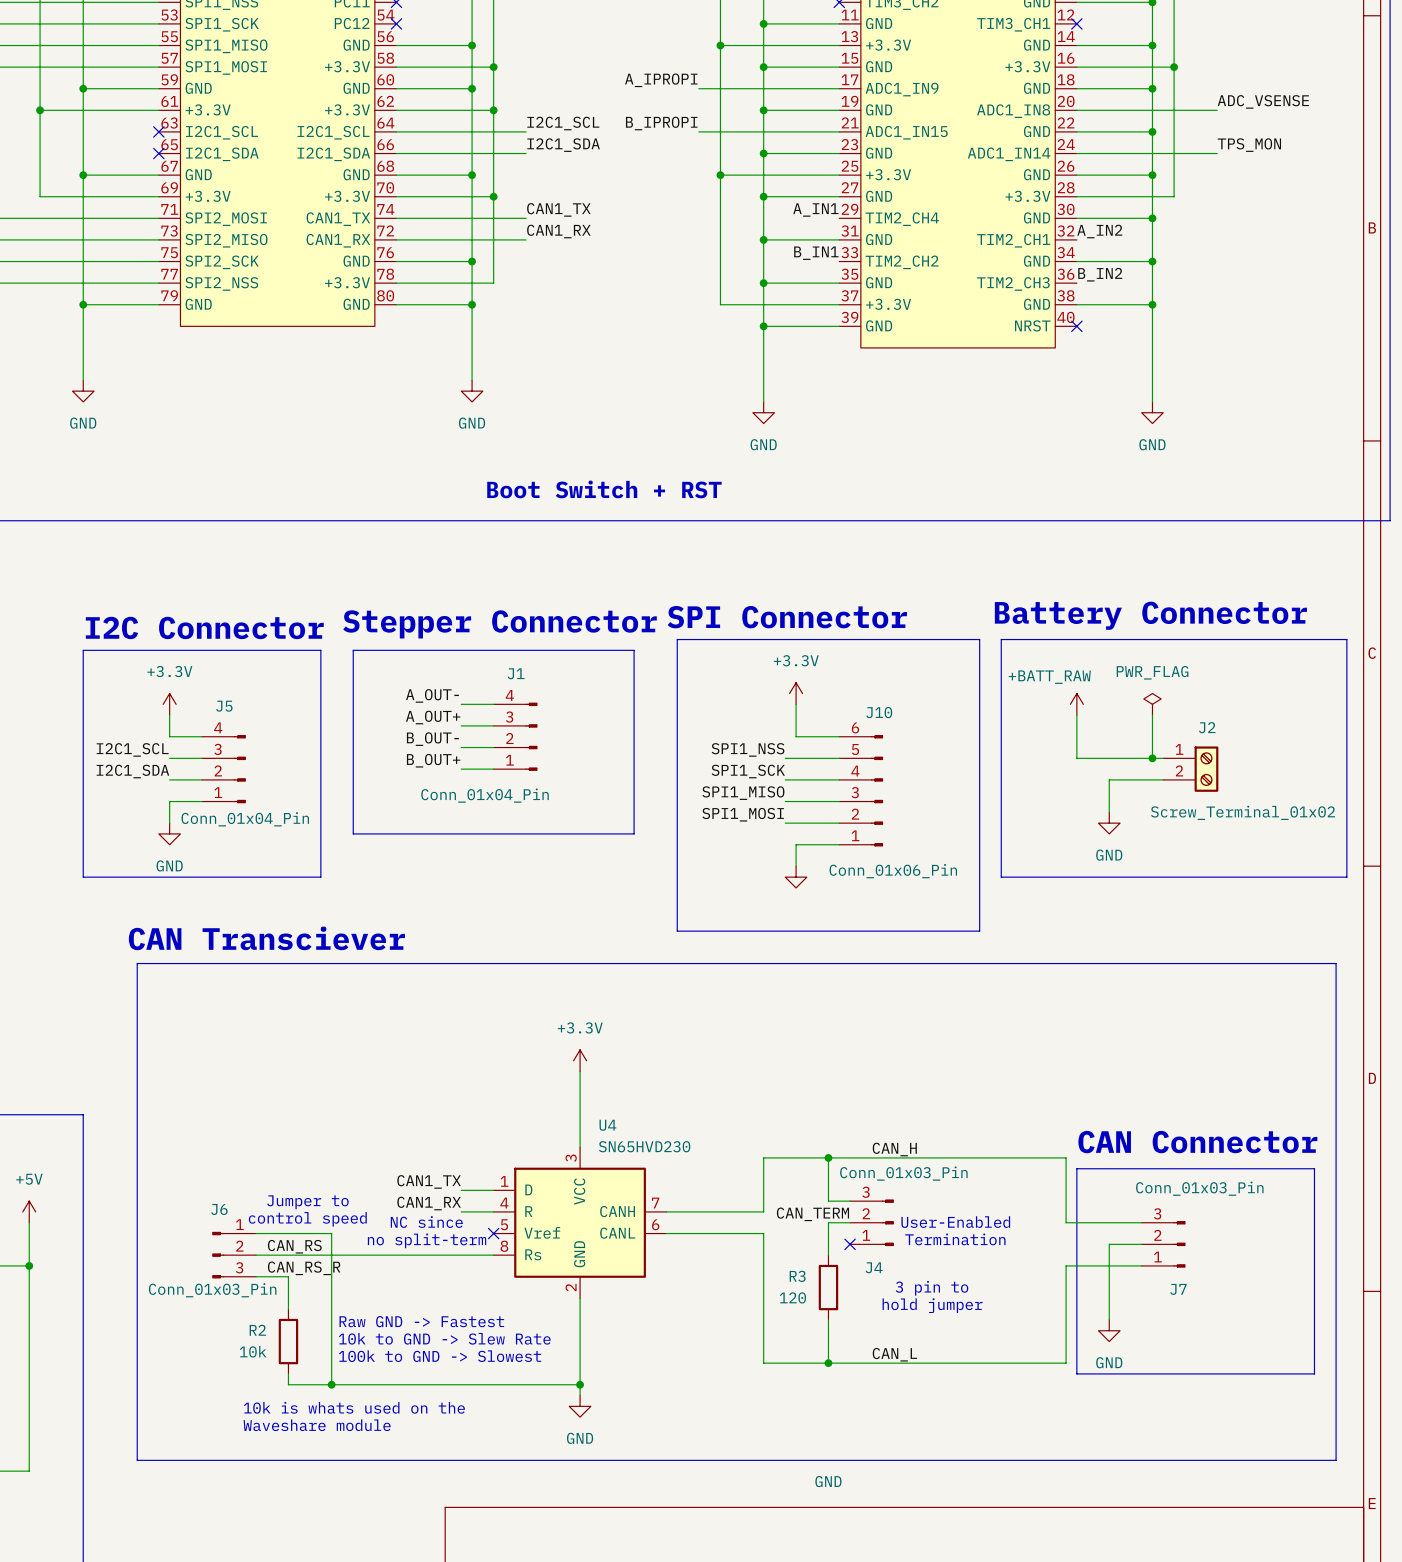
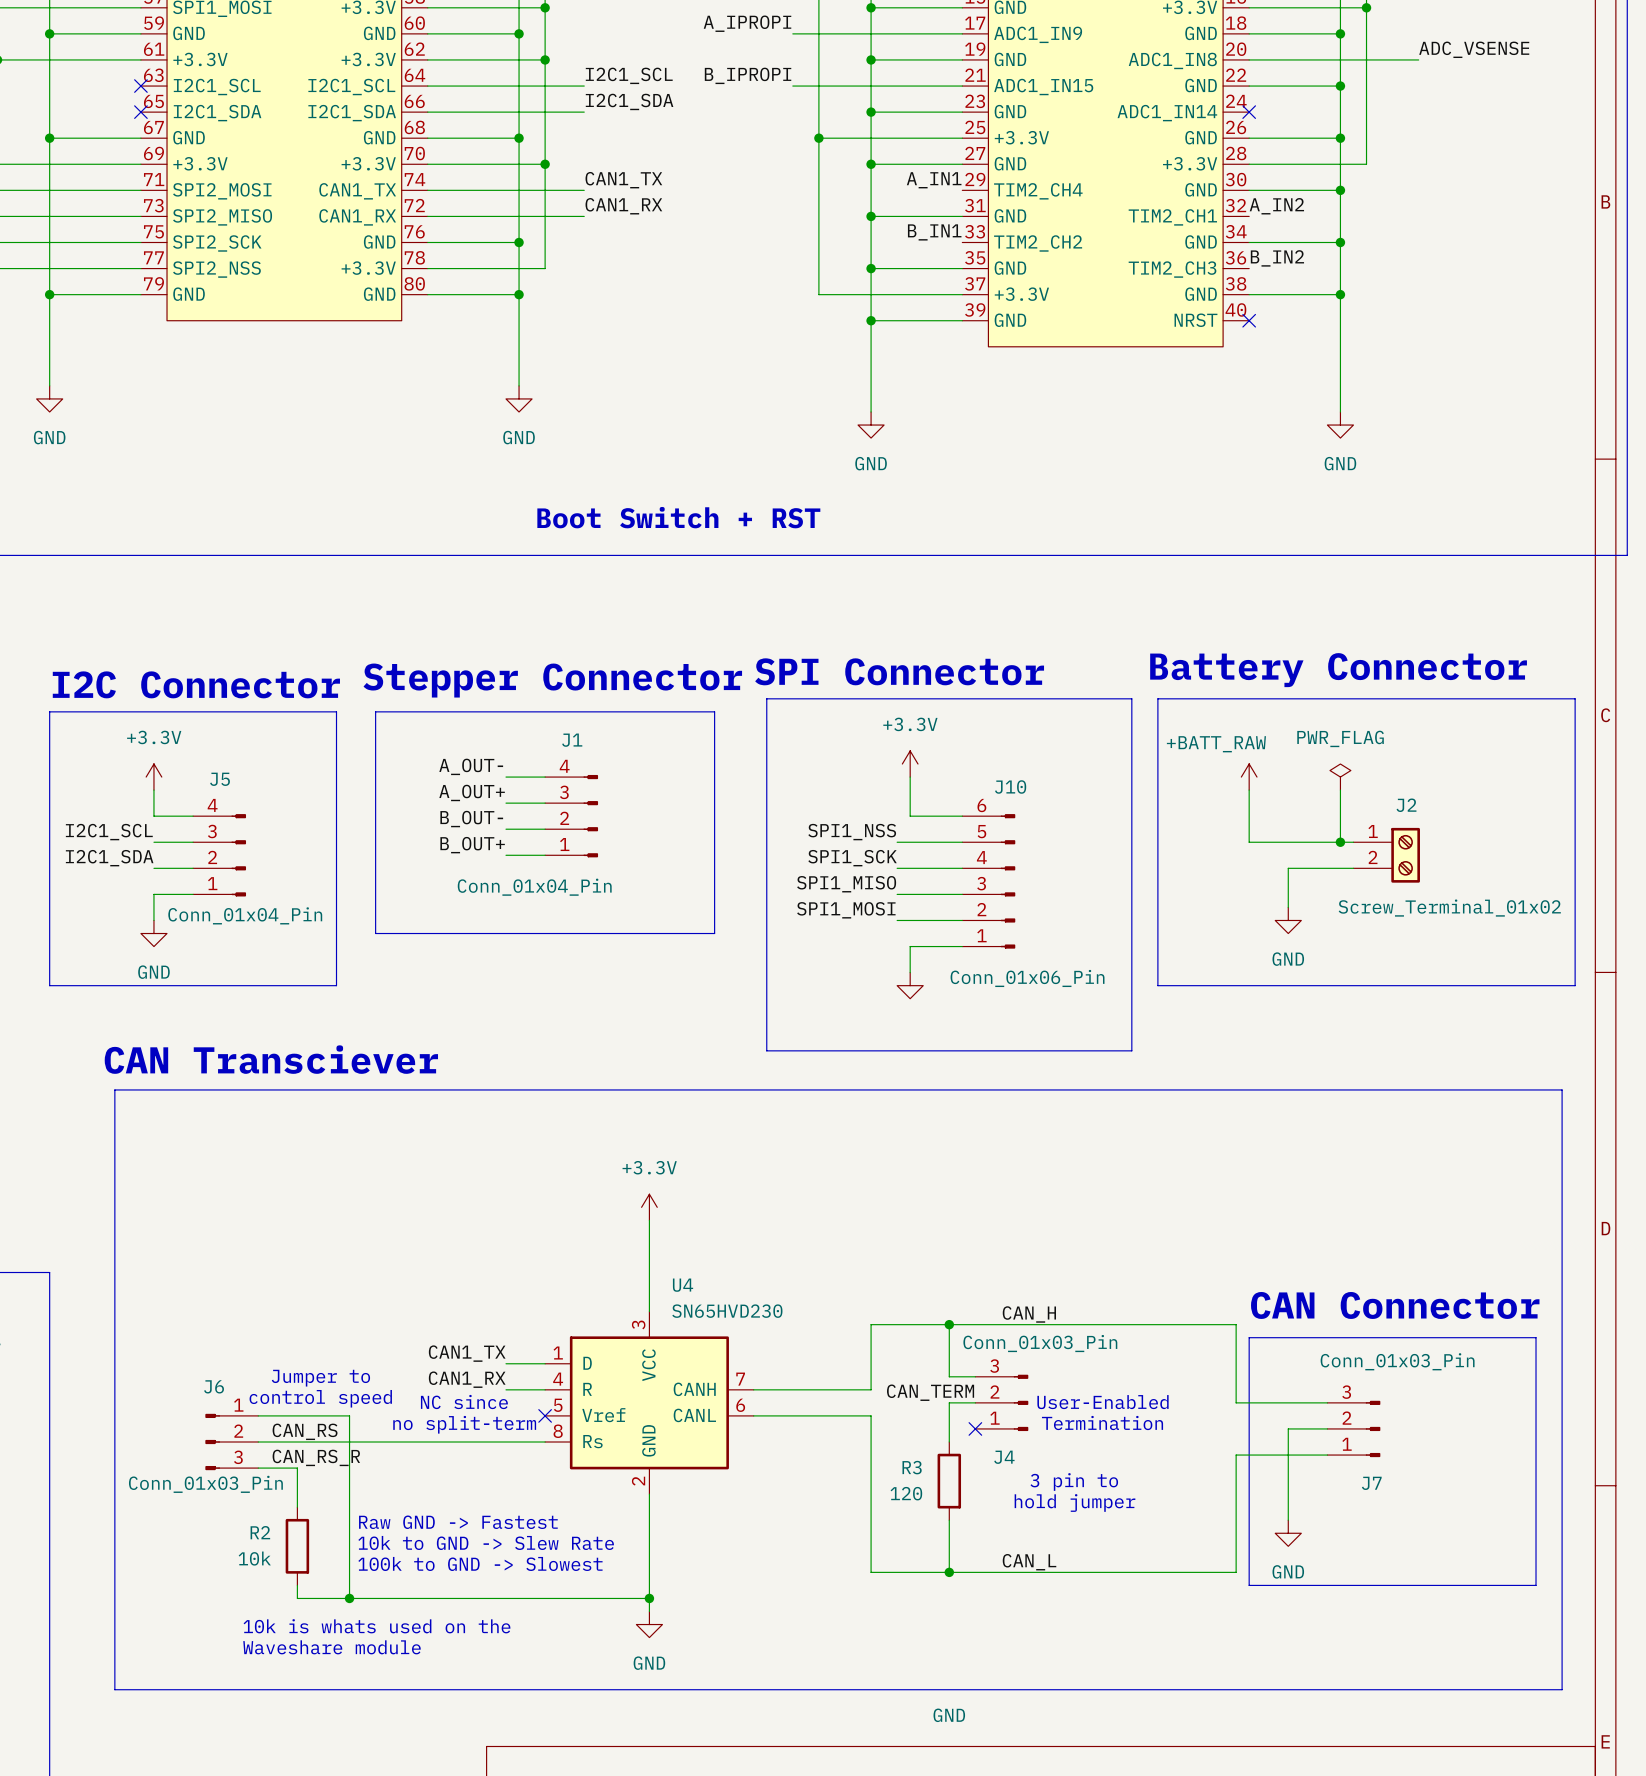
label: TPS_MON (1249, 145) -> none
wire: (1076, 153) (1217, 153) -> none
no-connect mark: none -> (1249, 112)

